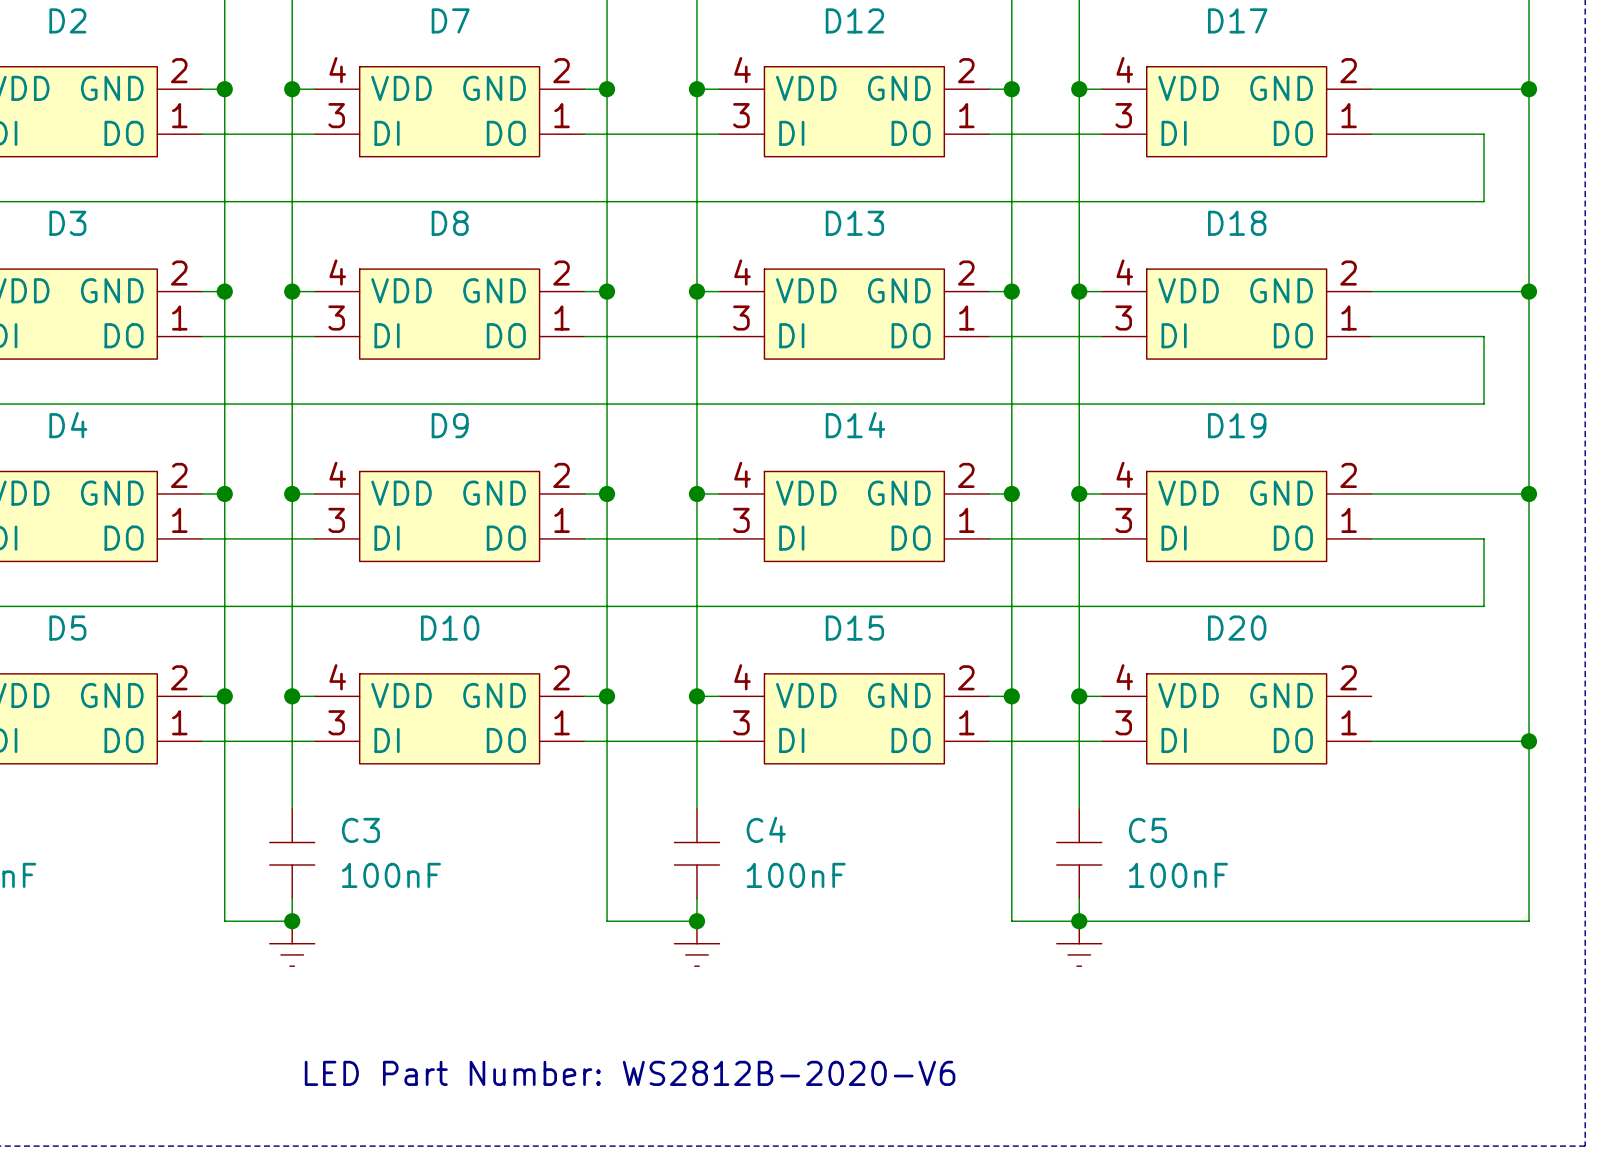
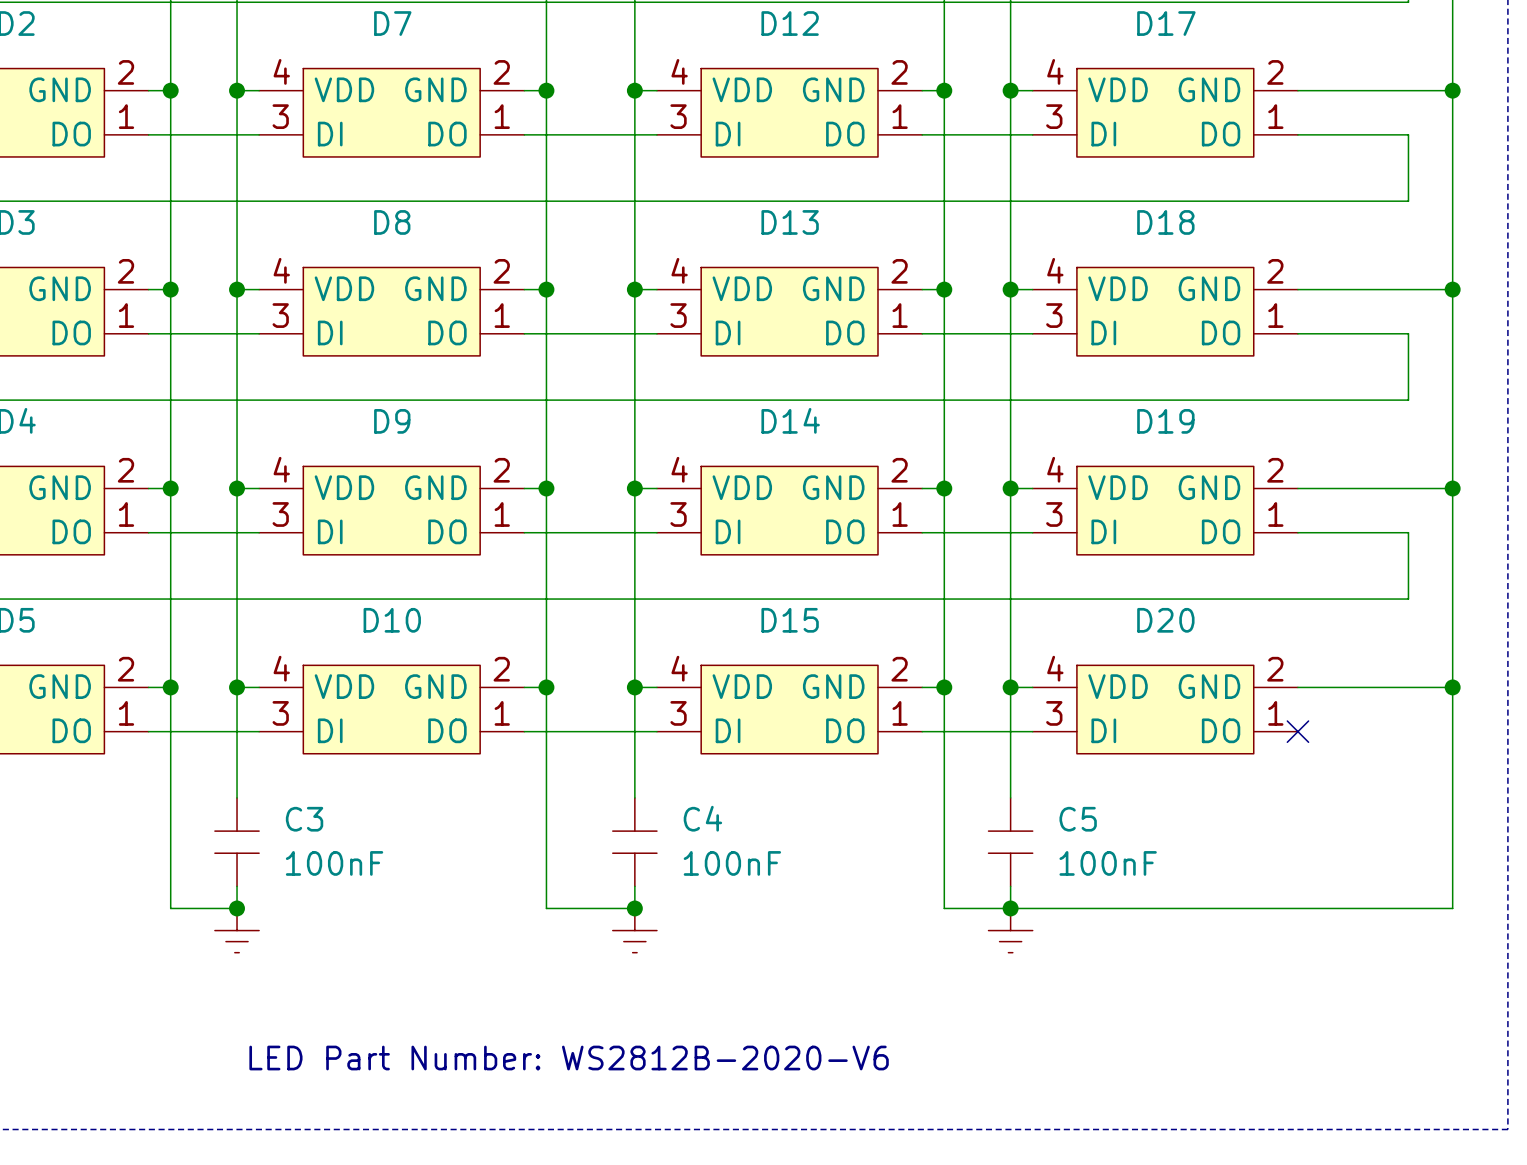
wire: (1371, 741) (1528, 741) -> (1297, 687) (1452, 687)
no-connect mark: none -> (1297, 731)
junction position: (1528, 741) -> (1452, 687)

